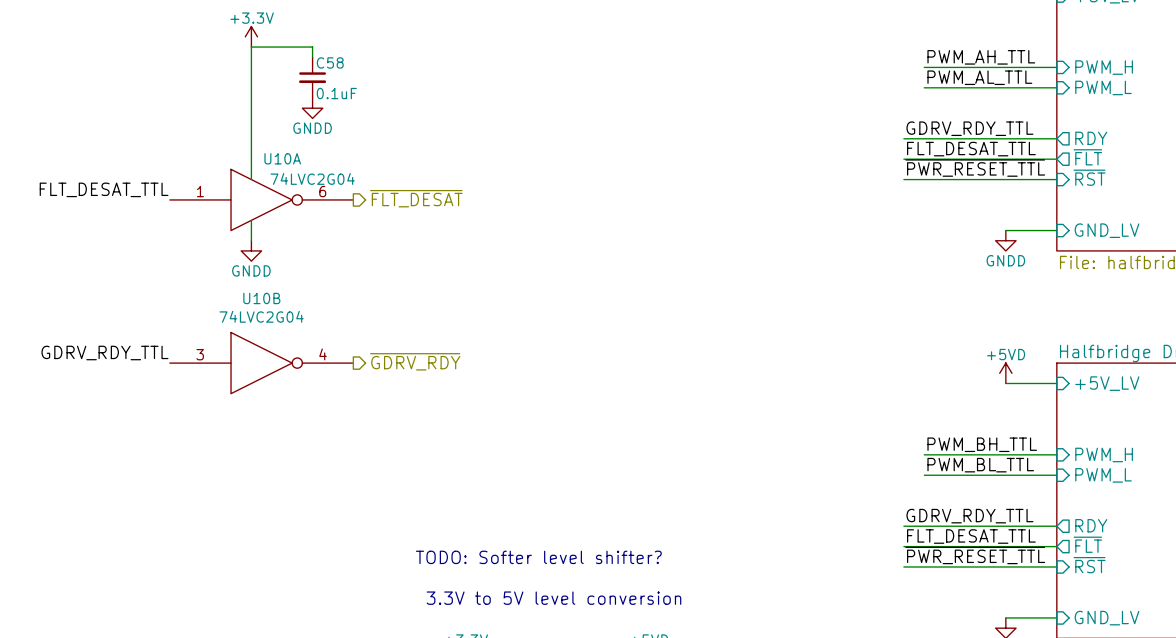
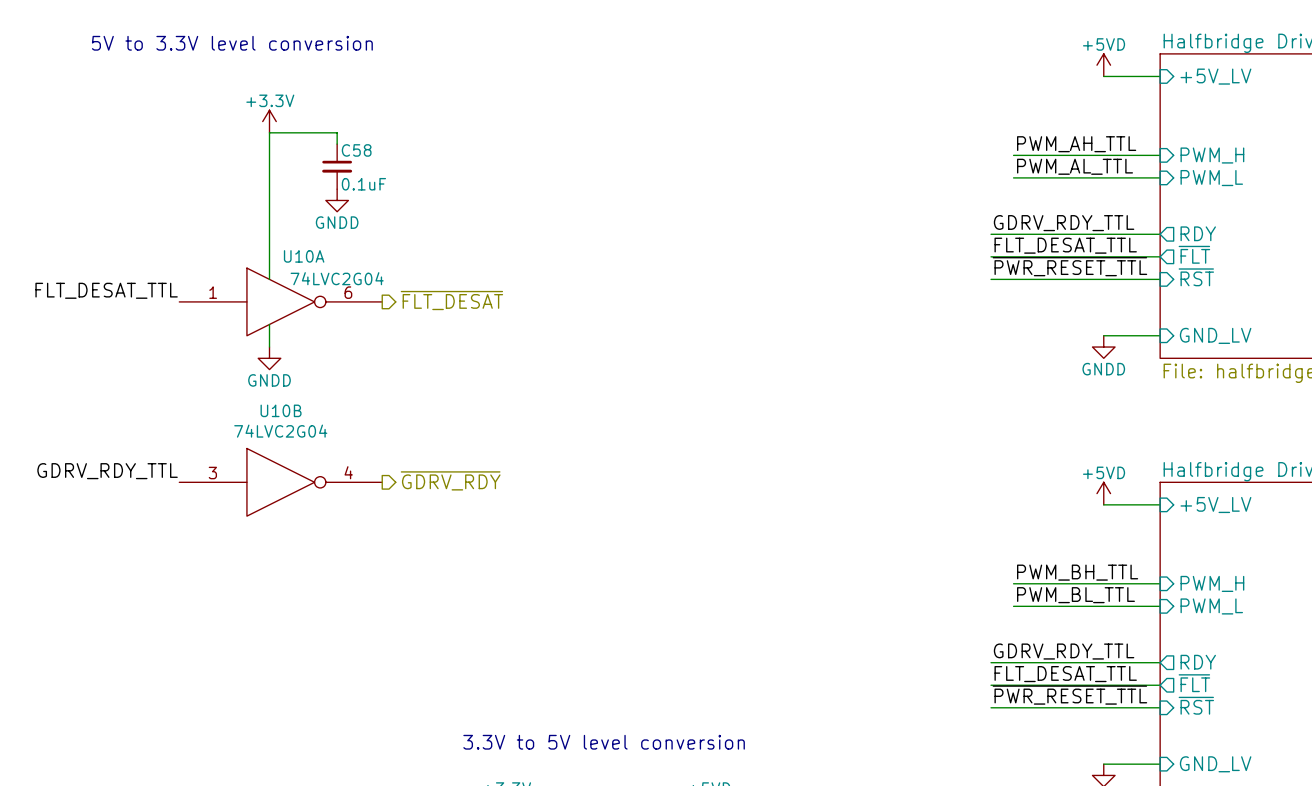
text: TODO: Softer level shifter? (538, 557) -> none

